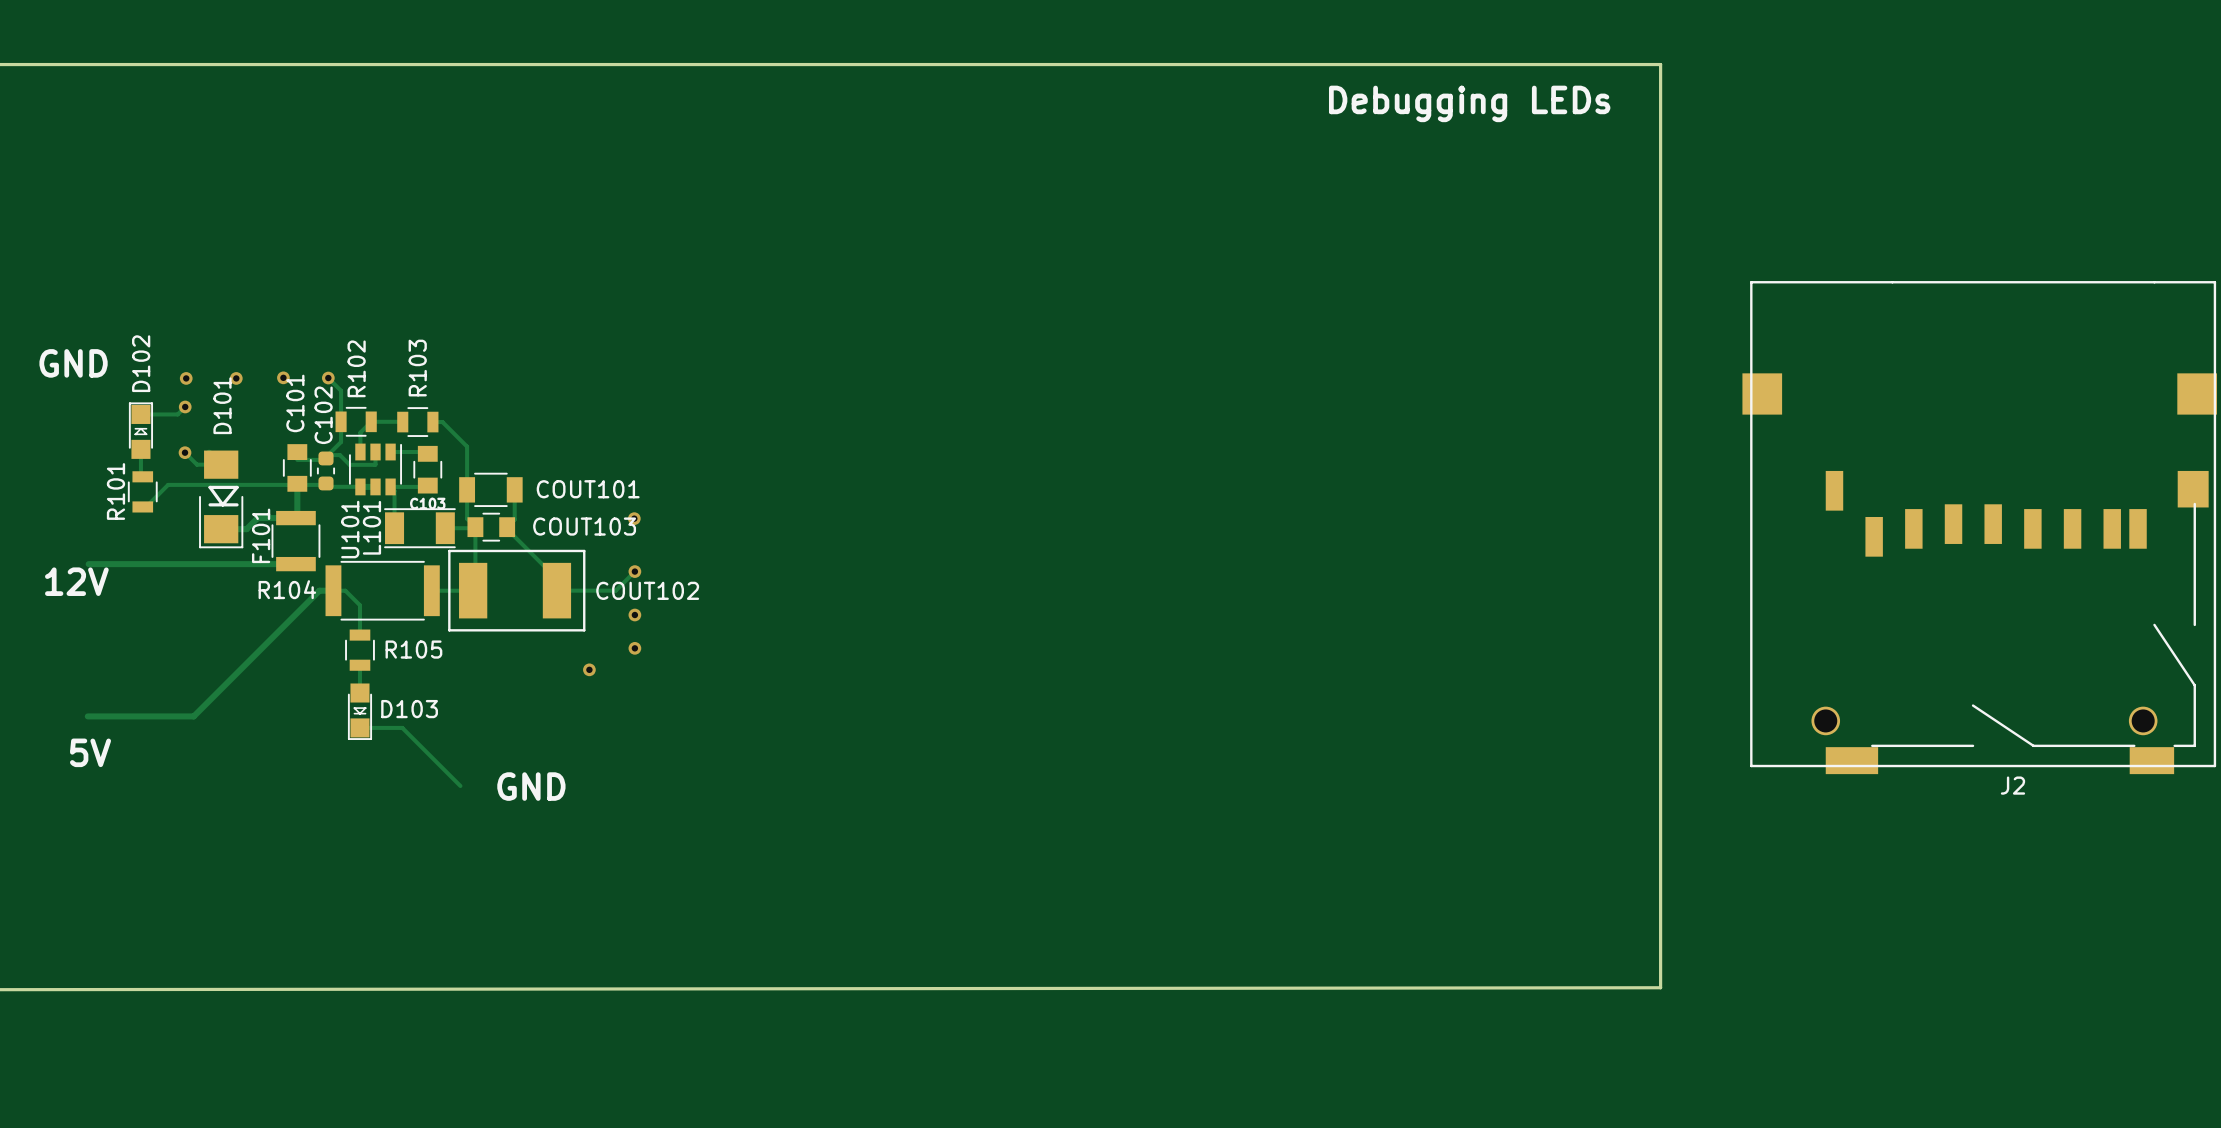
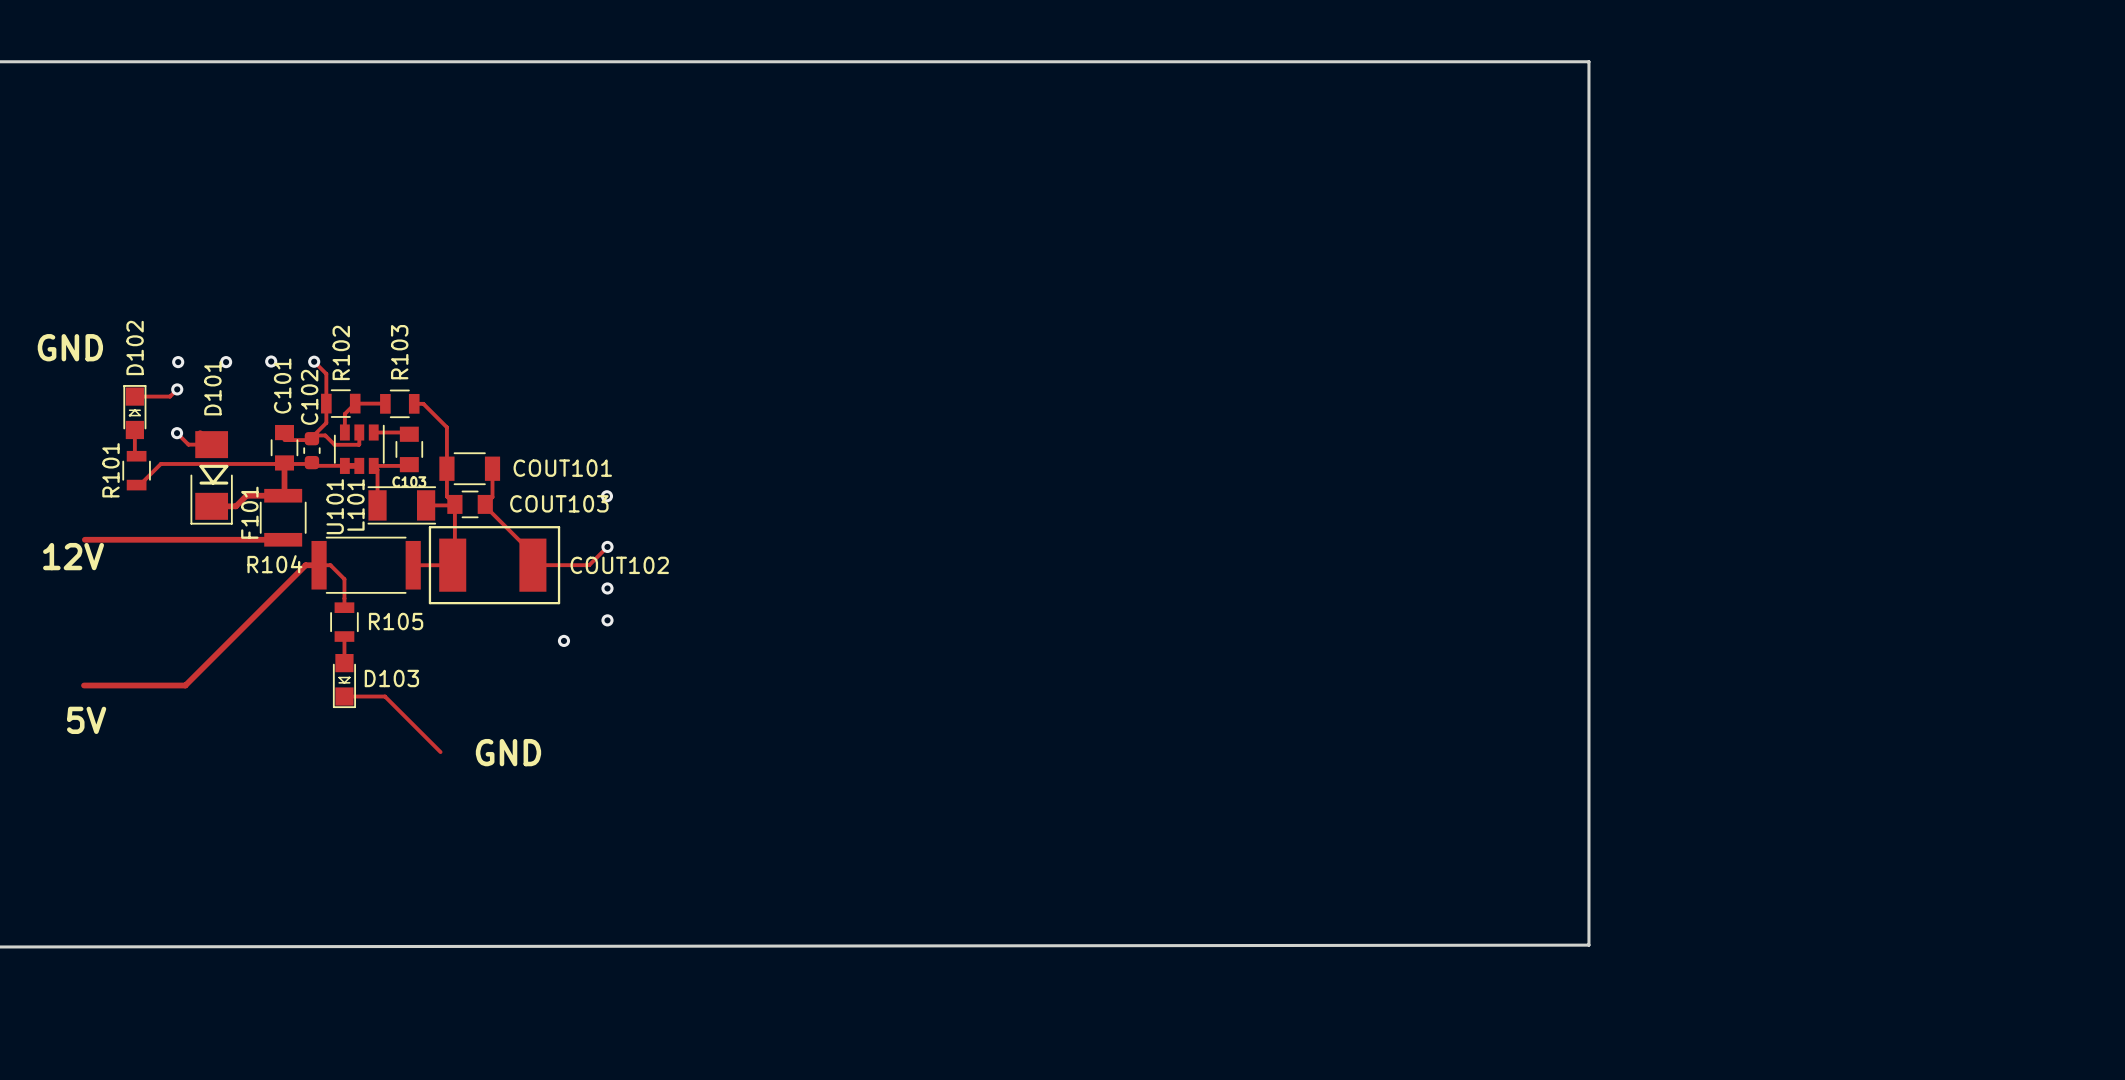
text: Debugging LEDs (1469, 103) -> none
J2: (1979, 527) -> none

